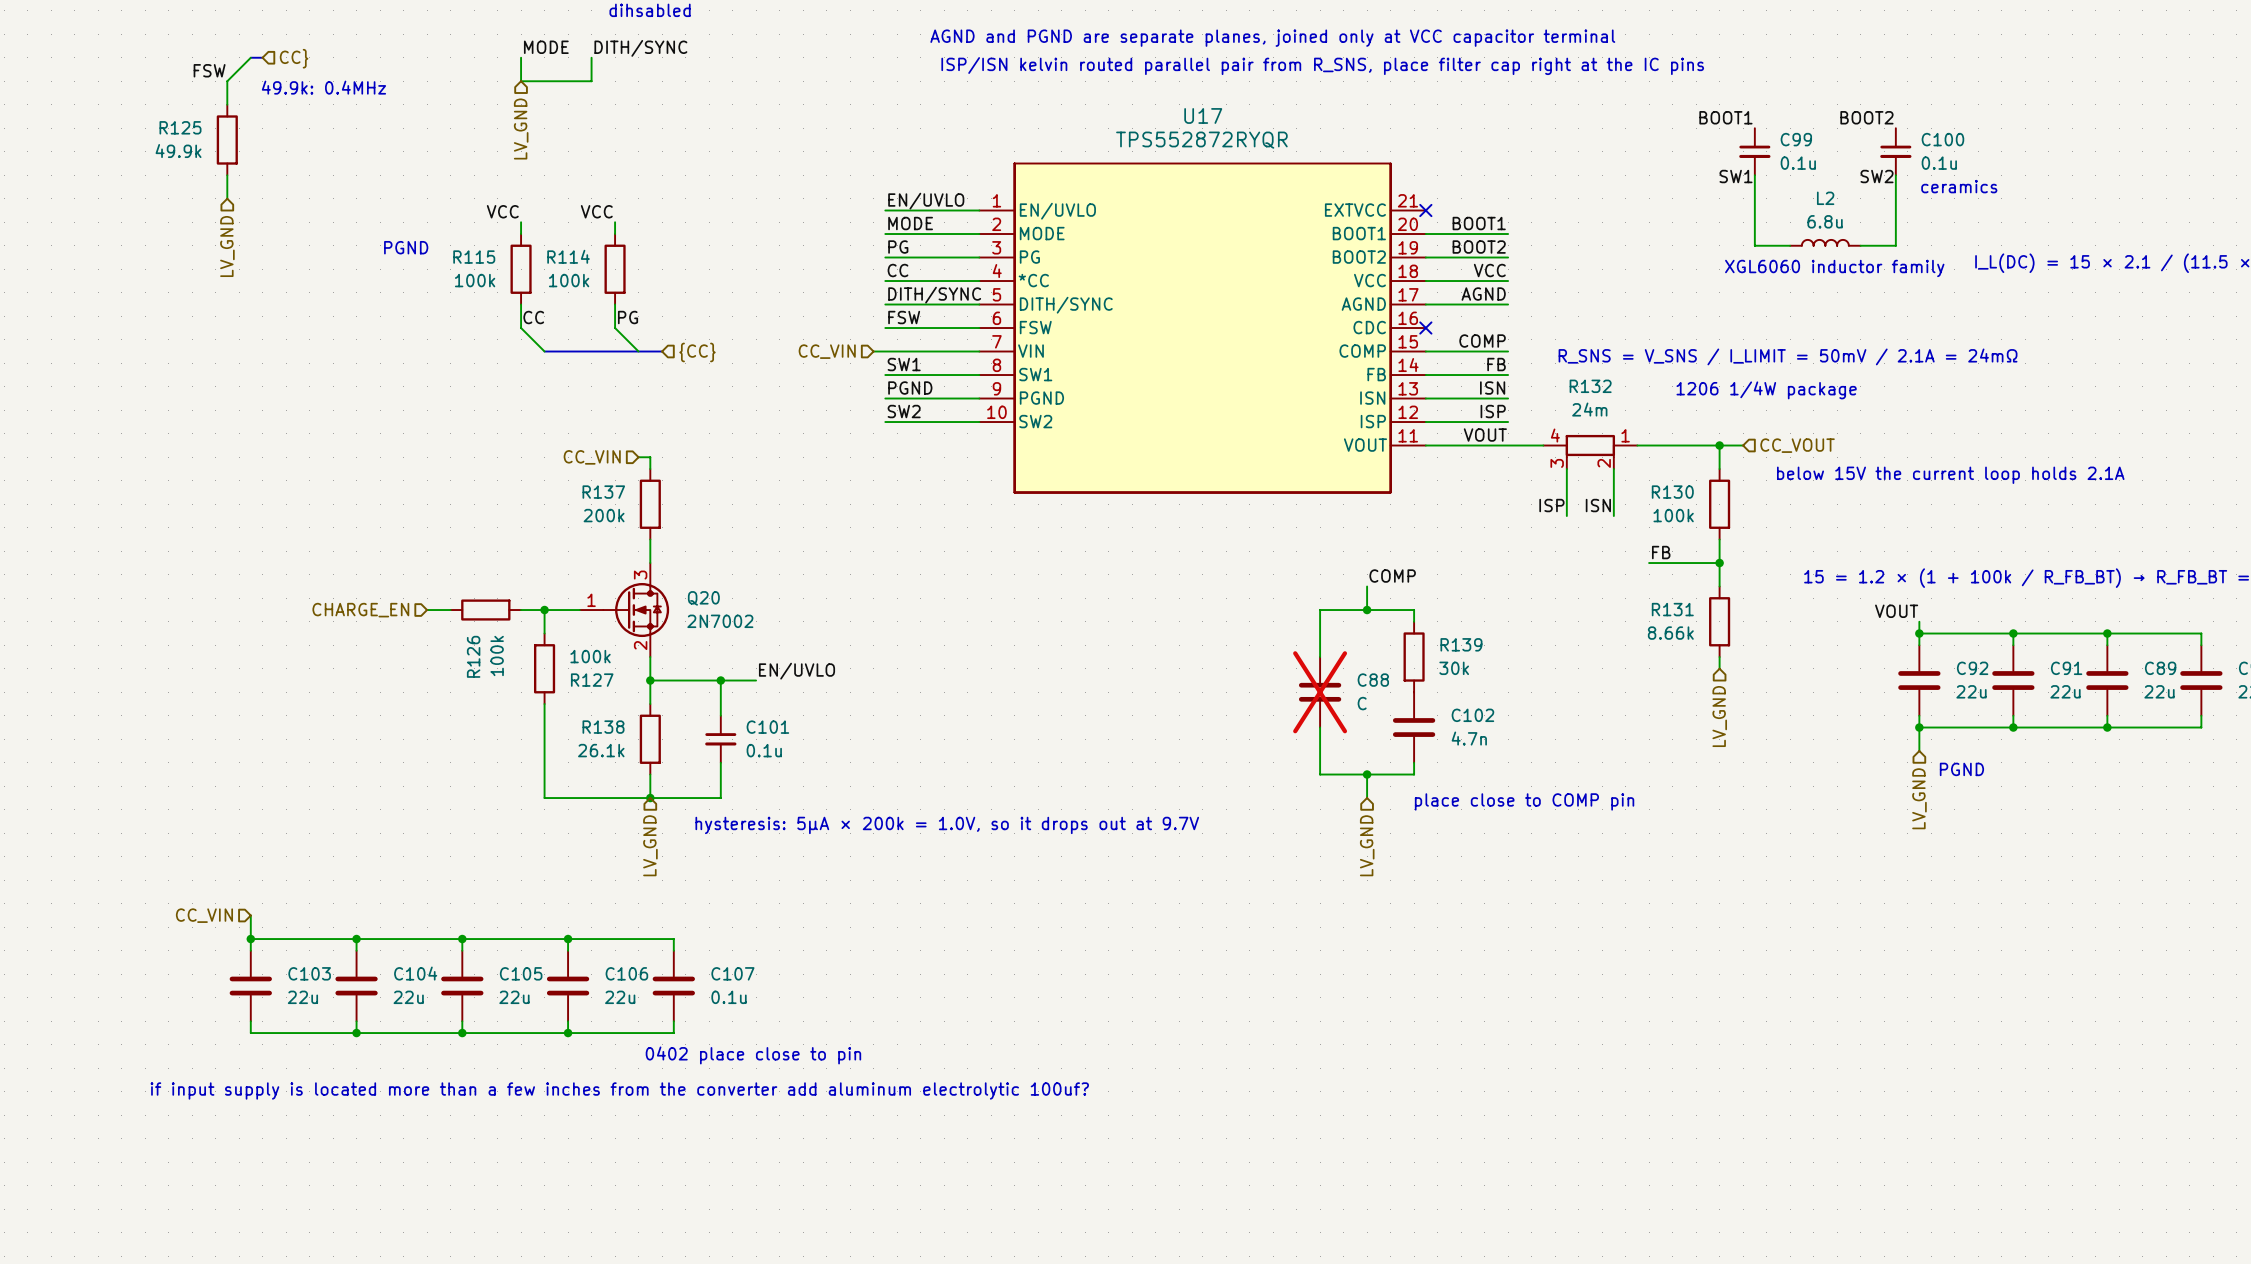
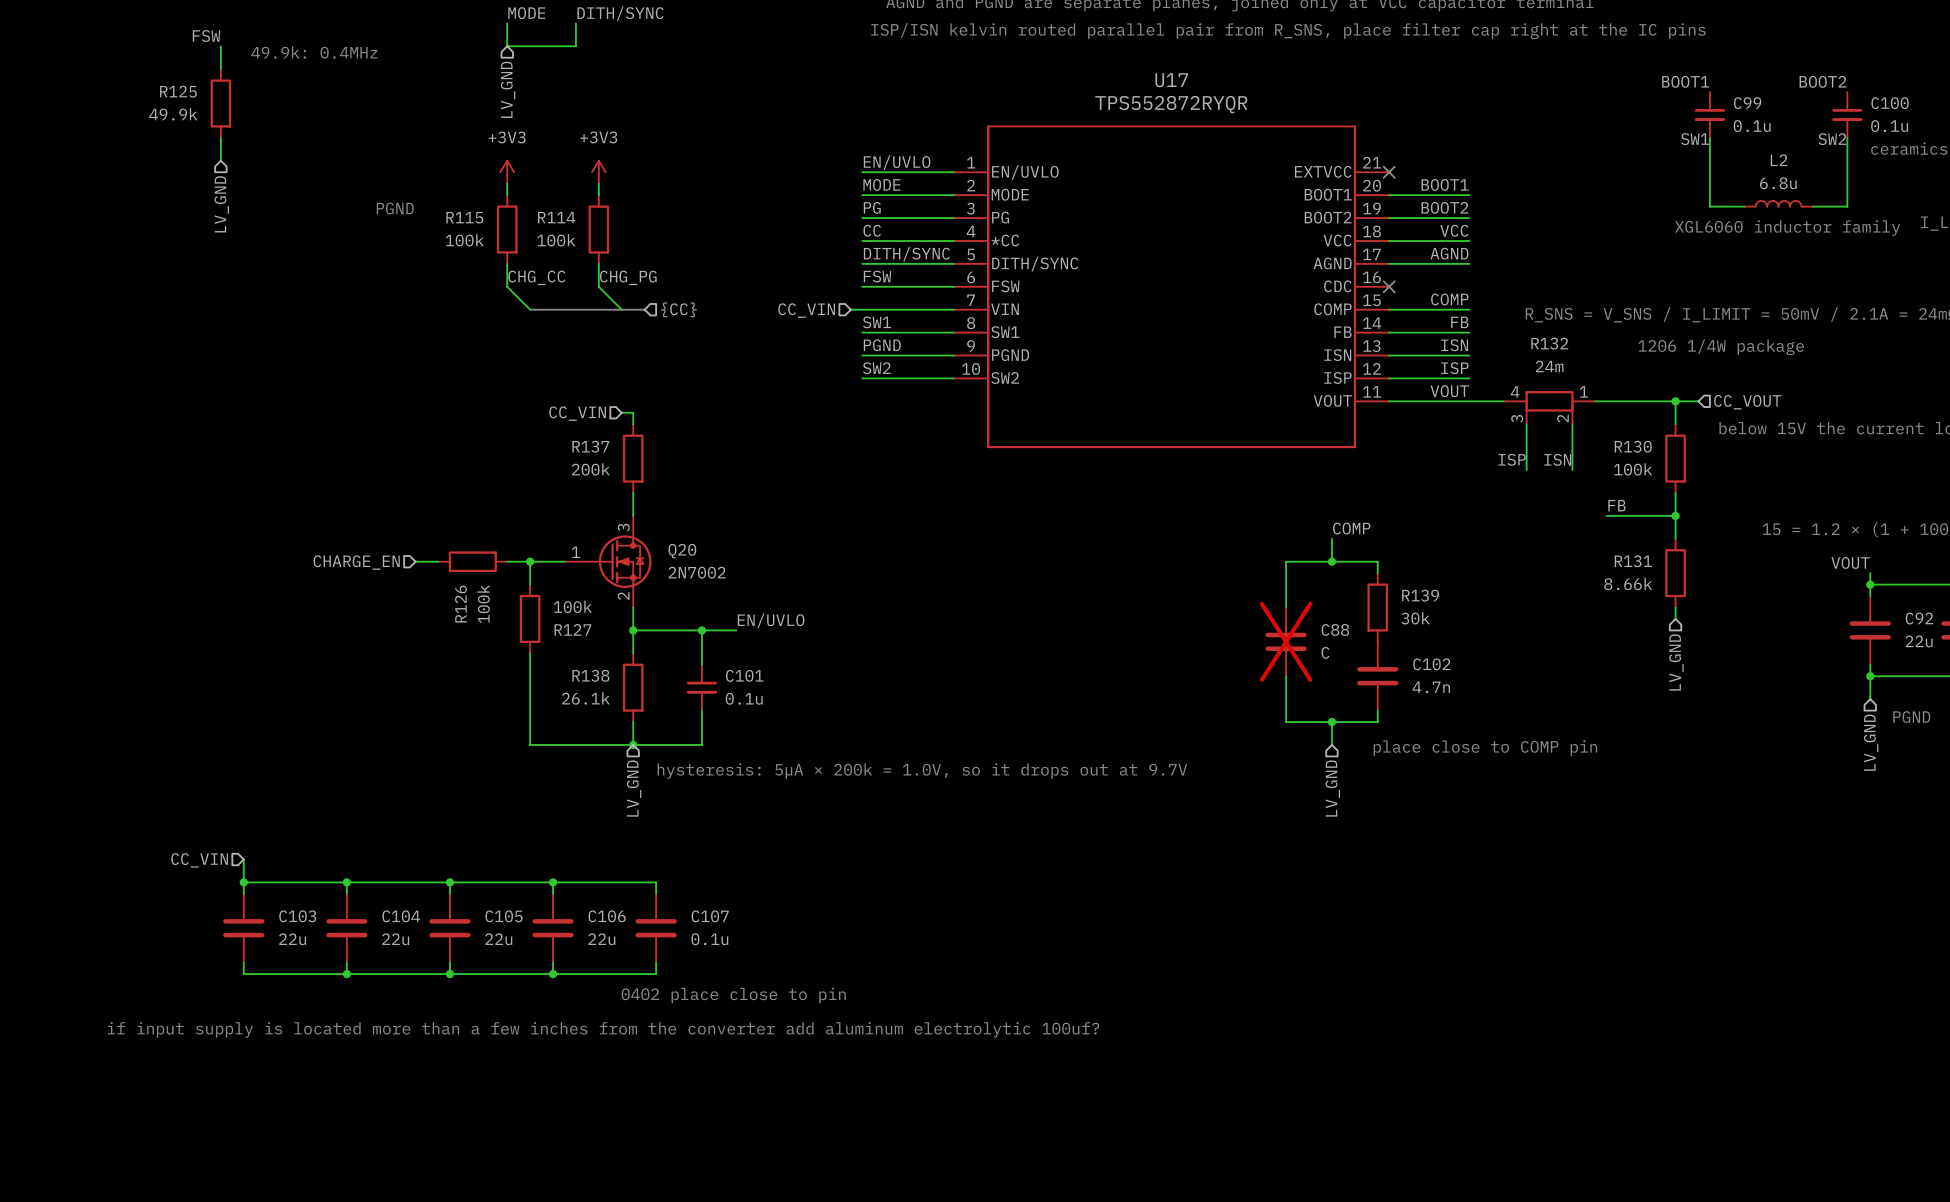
wire: (250, 57) (227, 81) -> none
bus: (250, 57) (262, 57) -> none
hierarchical label: CC} (294, 58) -> none
power symbol: none -> +3V3 (507, 172)
power symbol: none -> +3V3 (598, 172)
label: VCC (502, 211) -> none
label: VCC (596, 211) -> none
label: CC (533, 317) -> CHG_CC (536, 277)
label: PG (628, 317) -> CHG_PG (628, 277)

